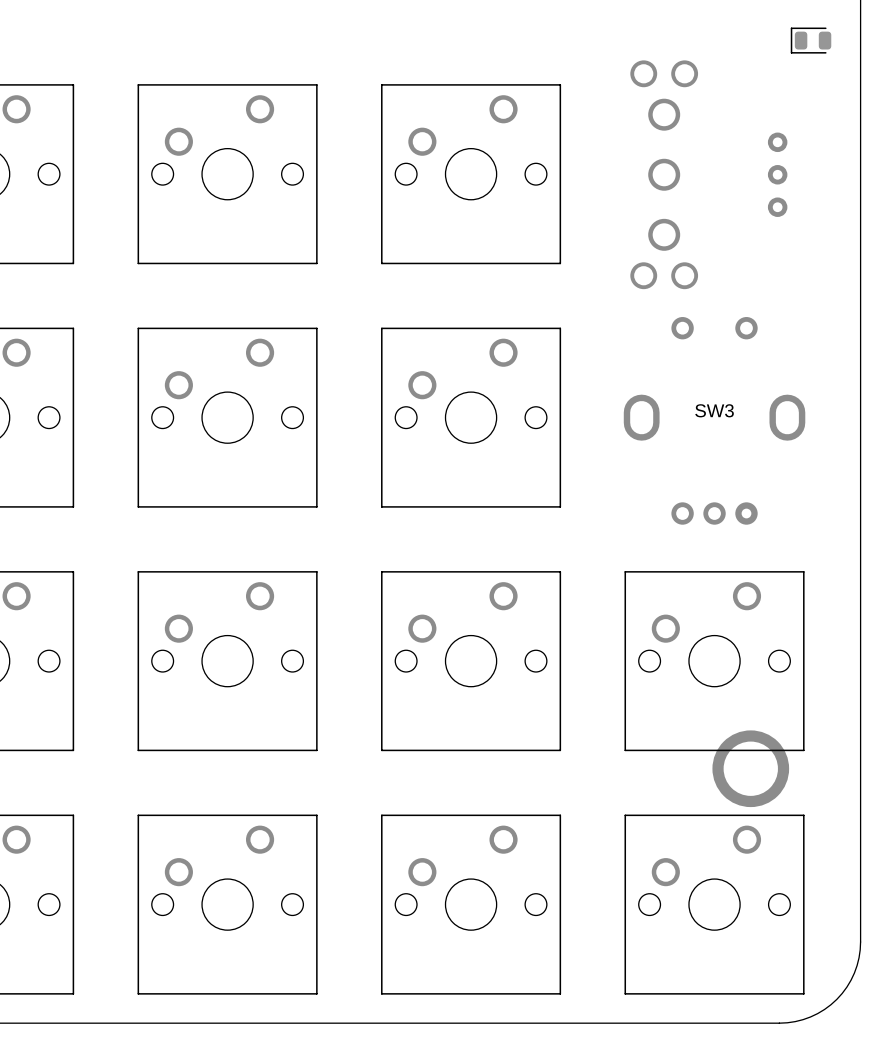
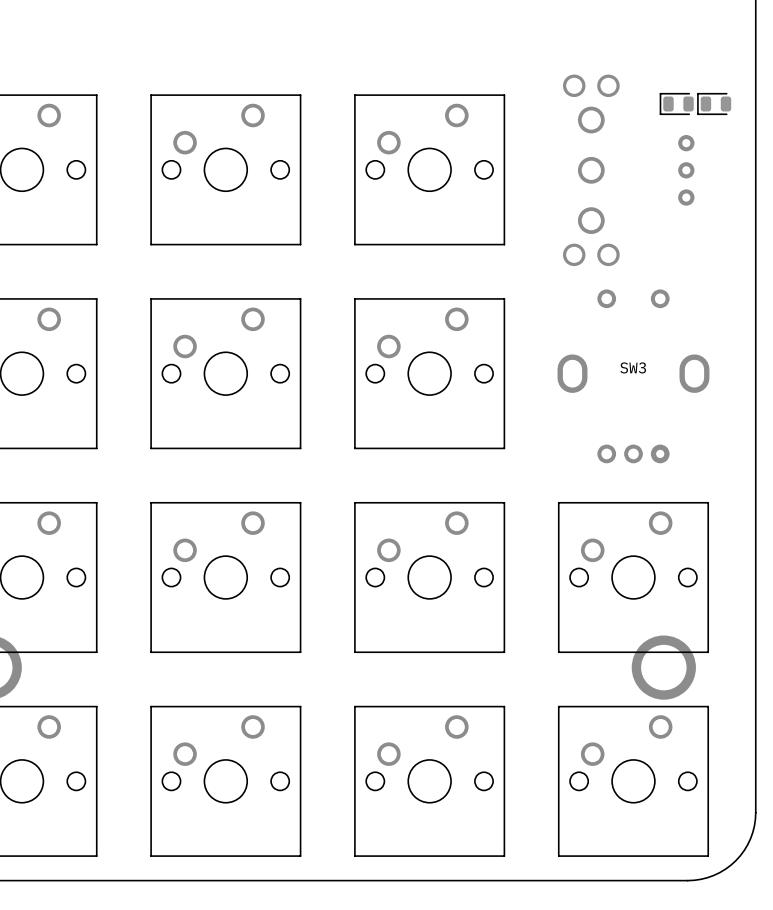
part: (811, 40) -> none
part: none -> (676, 103)
part: none -> (714, 103)

